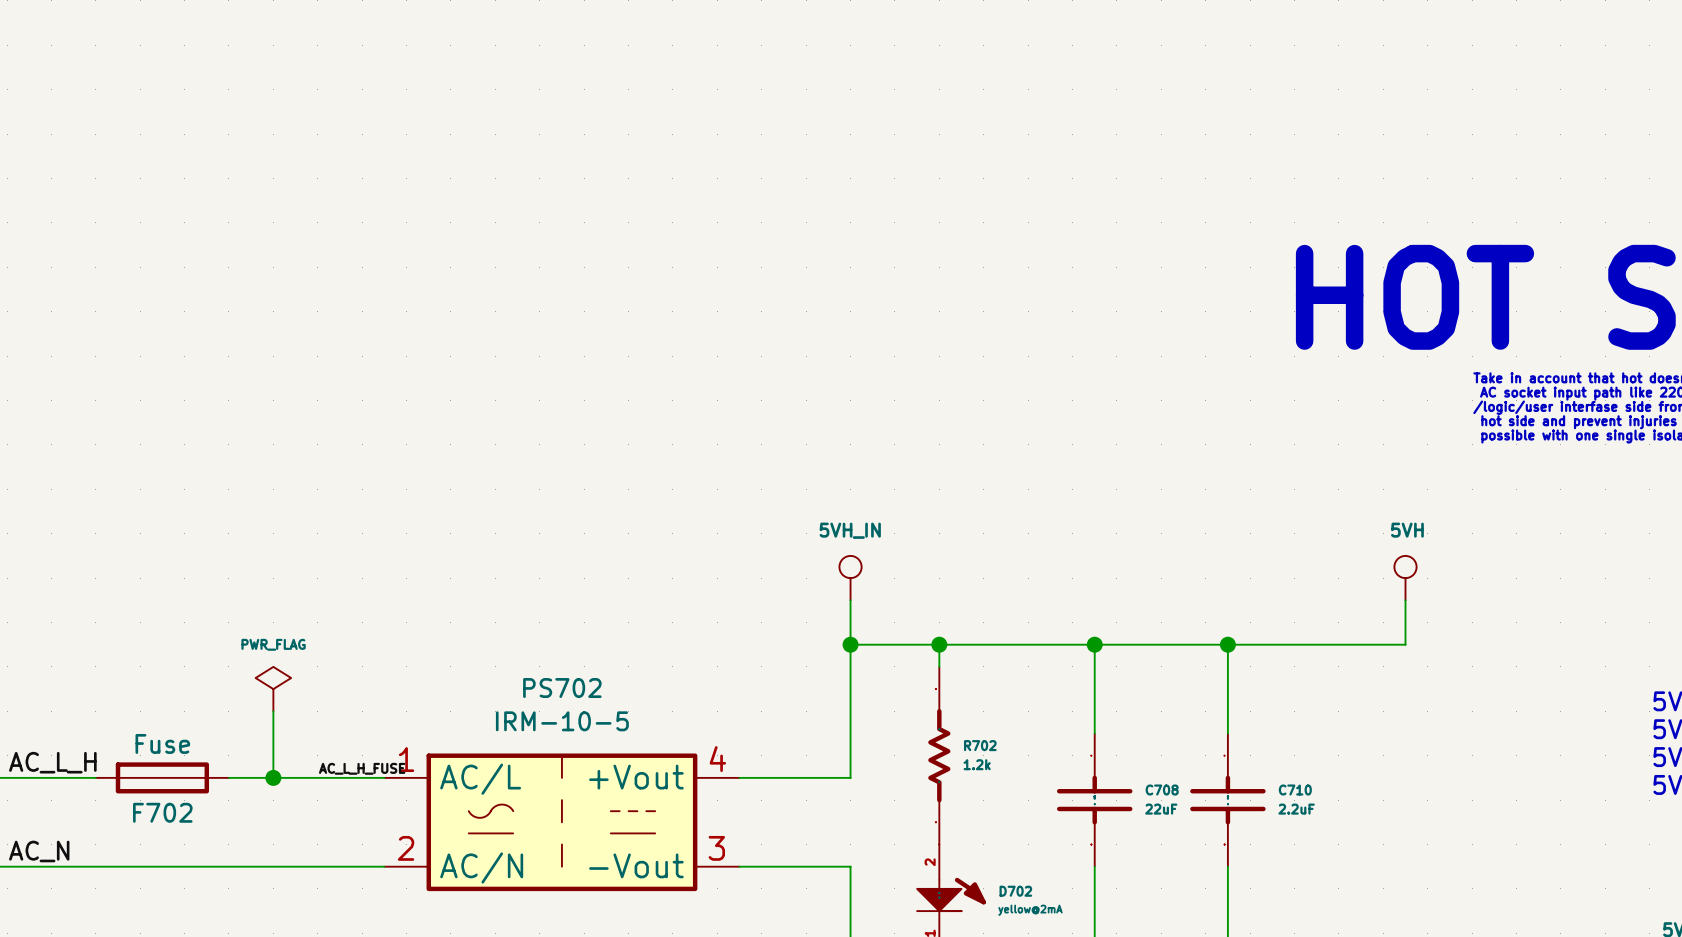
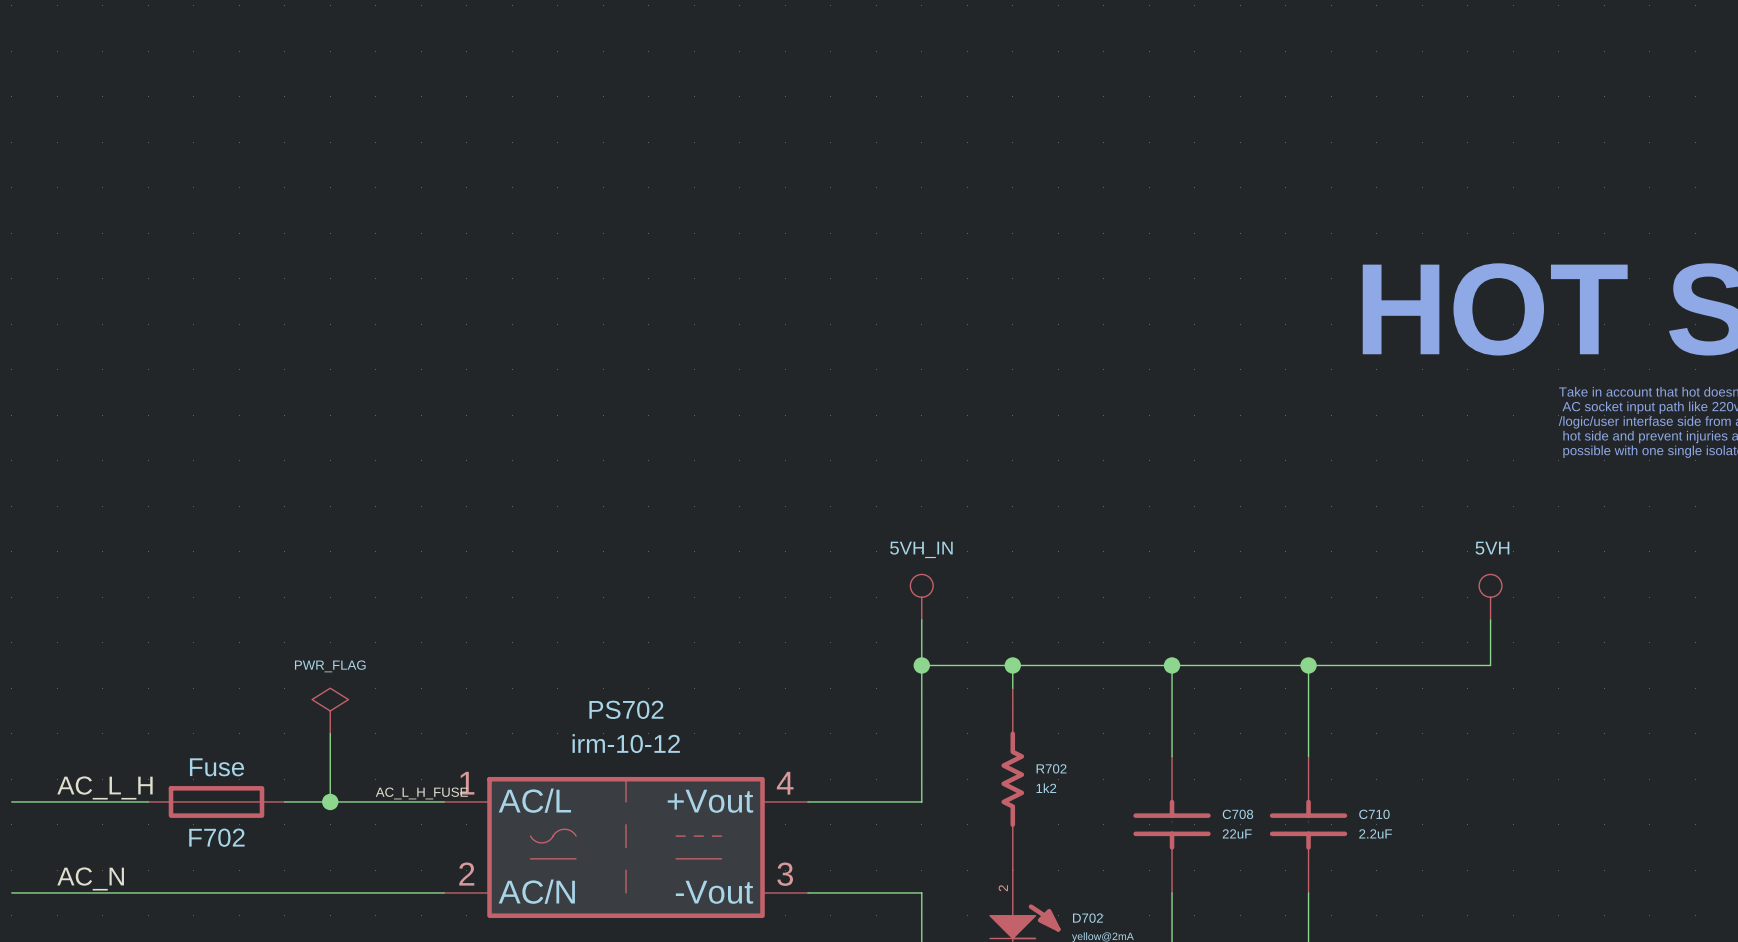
PS702 value: IRM-10-5 (562, 721) -> irm-10-12 (626, 743)
R702 value: 1.2k (977, 764) -> 1k2 (1046, 788)

